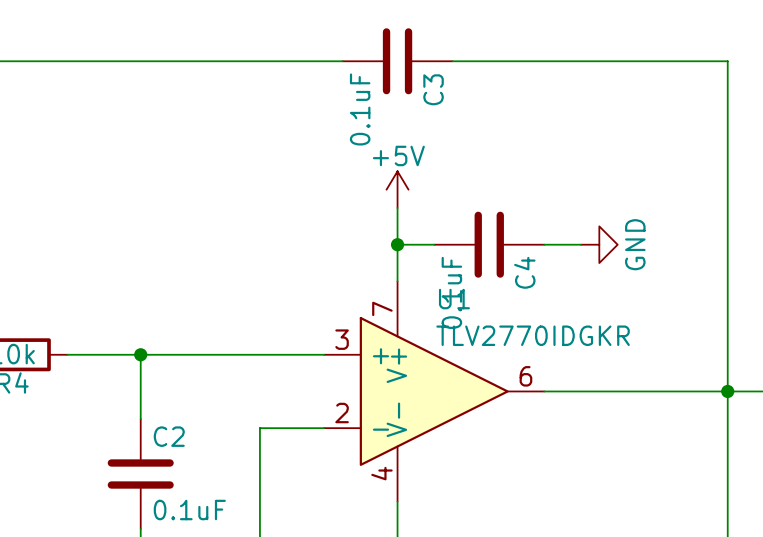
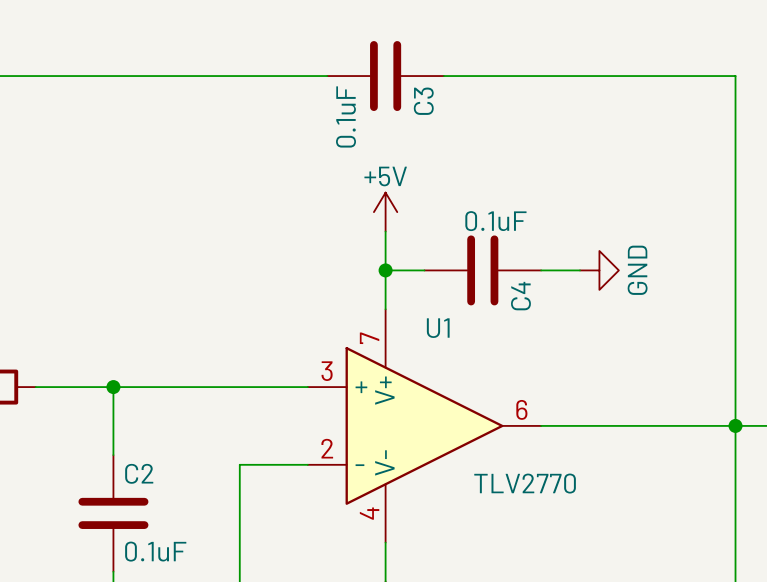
C4 value rotation: 0° (451, 292) -> 90° clockwise (495, 221)
C4 value position: 0.1uF (451, 292) -> 0.1uF (495, 221)
U1 value: TLV2770IDGKR (533, 335) -> TLV2770 (525, 483)

